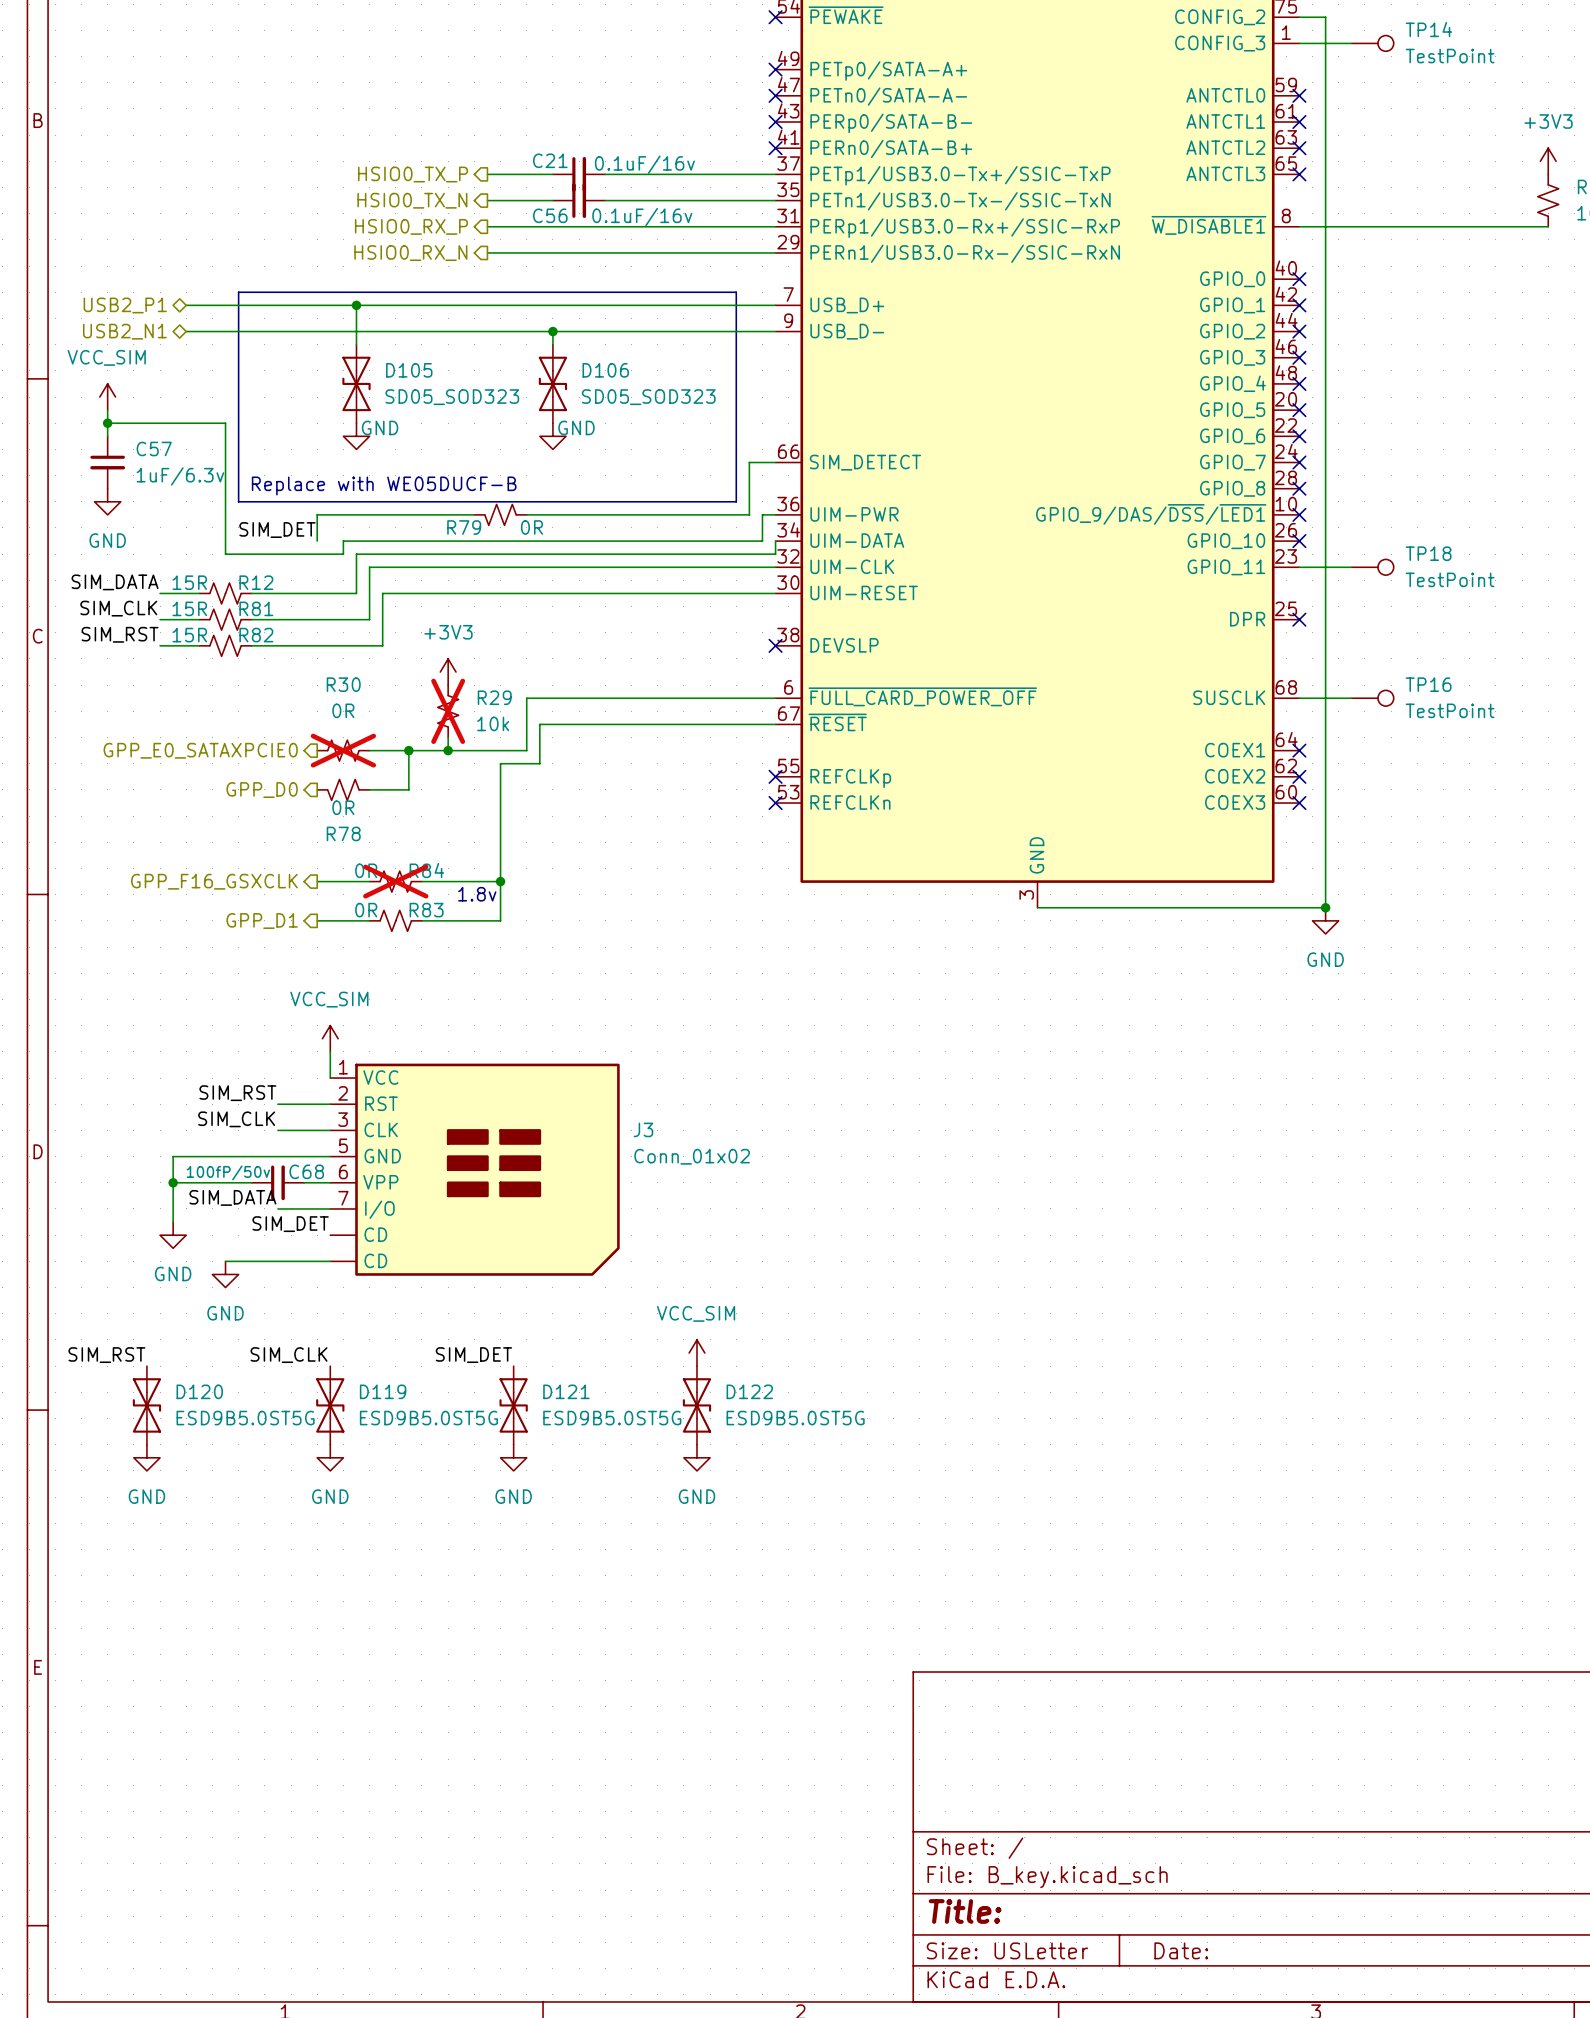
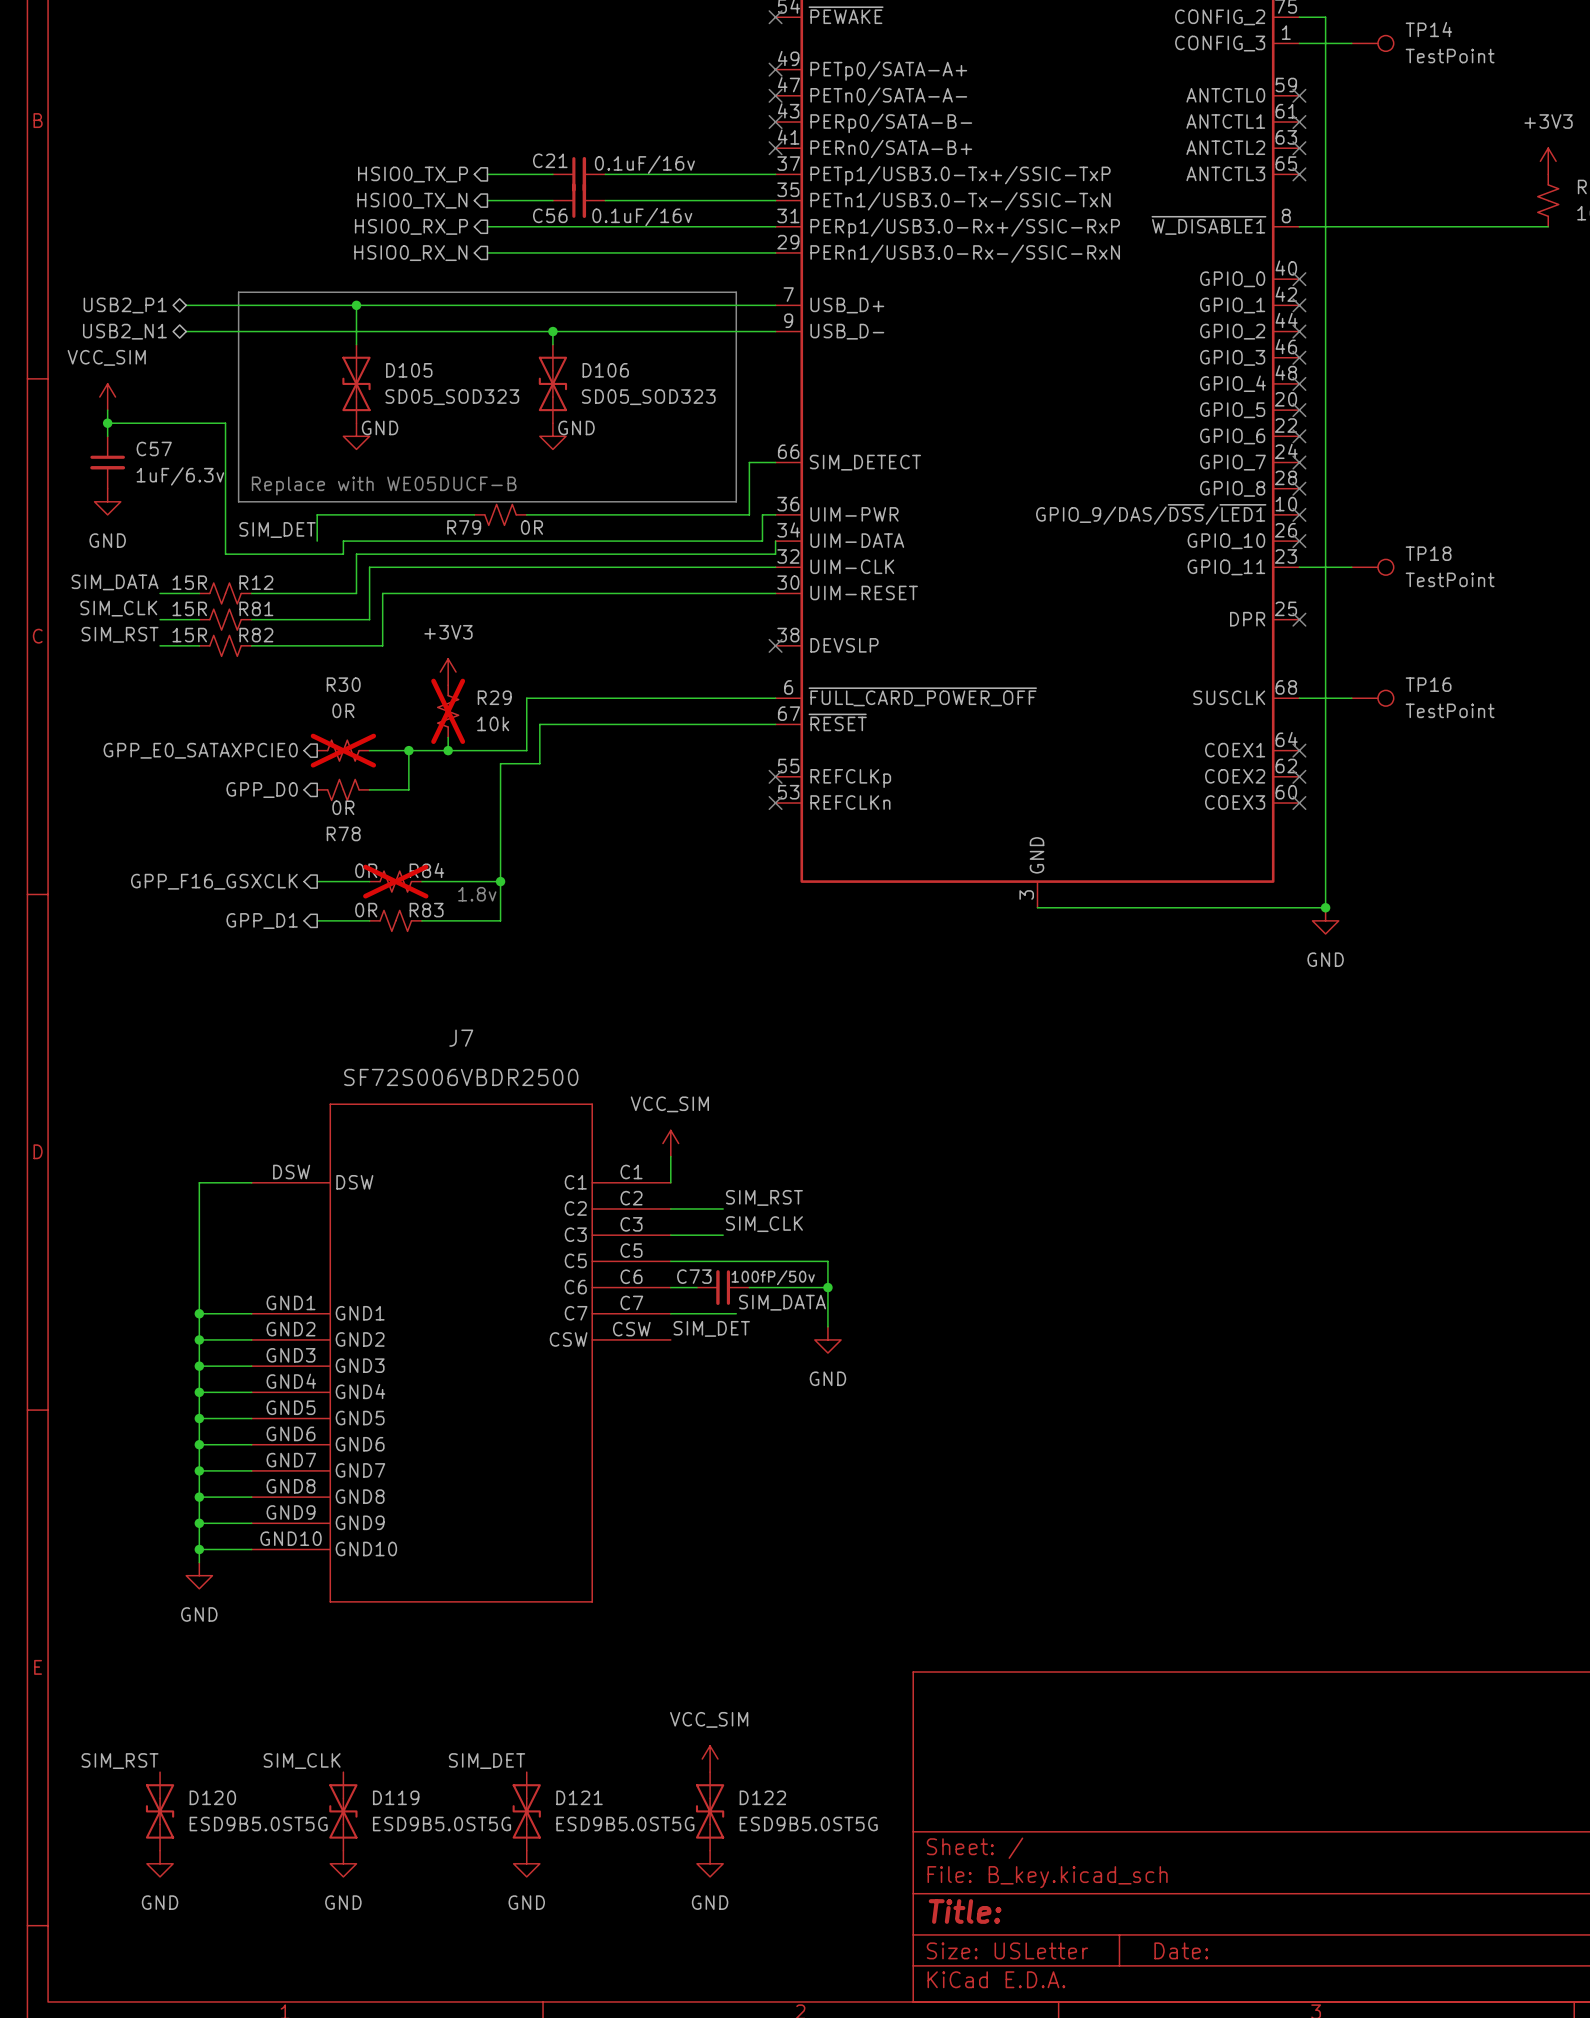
power symbol: VCC_SIM (330, 1038) -> none
wire: (330, 1051) (330, 1078) -> none
label: SIM_RST (237, 1093) -> none
wire: (277, 1104) (330, 1104) -> (199, 1313) (251, 1313)
label: SIM_CLK (236, 1119) -> none
wire: (277, 1130) (330, 1130) -> (199, 1339) (251, 1339)
power symbol: none -> VCC_SIM (670, 1143)
wire: (330, 1156) (173, 1156) (173, 1222) -> none
wire: none -> (670, 1156) (670, 1182)
J3: Conn_01x02 (475, 1169) -> none
wire: (173, 1182) (199, 1182) -> (199, 1562) (199, 1182)
junction: (173, 1182) -> none
C68: 100fP/50v (277, 1182) -> none
label: SIM_DATA (232, 1197) -> none
label: none -> SIM_RST (764, 1197)
wire: (277, 1208) (330, 1208) -> (199, 1418) (251, 1418)
wire: none -> (670, 1208) (723, 1208)
label: SIM_DET (290, 1224) -> none
label: none -> SIM_CLK (764, 1224)
power symbol: GND (173, 1235) -> none
wire: none -> (670, 1235) (723, 1235)
wire: (225, 1261) (330, 1261) -> none
wire: none -> (670, 1261) (827, 1261) (827, 1326)
power symbol: GND (225, 1274) -> none
wire: none -> (670, 1287) (696, 1287)
C73: none -> 100fP/50v (723, 1287)
wire: none -> (749, 1287) (827, 1287)
junction: none -> (827, 1287)
label: none -> SIM_DATA (782, 1302)
junction: none -> (199, 1313)
wire: none -> (670, 1313) (736, 1313)
junction: none -> (199, 1339)
power symbol: none -> GND (827, 1339)
J7: none -> SF72S006VBDR2500 (461, 1353)
power symbol: VCC_SIM (696, 1353) -> none
label: SIM_RST (106, 1355) -> none
label: SIM_CLK (289, 1355) -> none
label position: SIM_DET (473, 1355) -> SIM_DET (711, 1328)
wire: none -> (199, 1366) (251, 1366)
junction: none -> (199, 1366)
wire: none -> (199, 1392) (251, 1392)
junction: none -> (199, 1392)
D120 position: (146, 1405) -> (160, 1811)
D119 position: (330, 1405) -> (343, 1811)
D121 position: (513, 1405) -> (526, 1811)
D122 position: (696, 1405) -> (710, 1811)
junction: none -> (199, 1418)
wire: none -> (199, 1444) (251, 1444)
junction: none -> (199, 1444)
power symbol: GND (146, 1457) -> none
power symbol: GND (330, 1457) -> none
power symbol: GND (513, 1457) -> none
power symbol: GND (696, 1457) -> none
wire: none -> (199, 1470) (251, 1470)
junction: none -> (199, 1470)
wire: none -> (199, 1497) (251, 1497)
junction: none -> (199, 1497)
wire: none -> (199, 1523) (251, 1523)
junction: none -> (199, 1523)
wire: none -> (199, 1549) (251, 1549)
junction: none -> (199, 1549)
power symbol: none -> GND (199, 1575)
power symbol: none -> VCC_SIM (710, 1759)
label: none -> SIM_RST (120, 1761)
label: none -> SIM_CLK (302, 1761)
label: none -> SIM_DET (487, 1761)
power symbol: none -> GND (160, 1863)
power symbol: none -> GND (343, 1863)
power symbol: none -> GND (526, 1863)
power symbol: none -> GND (710, 1863)

